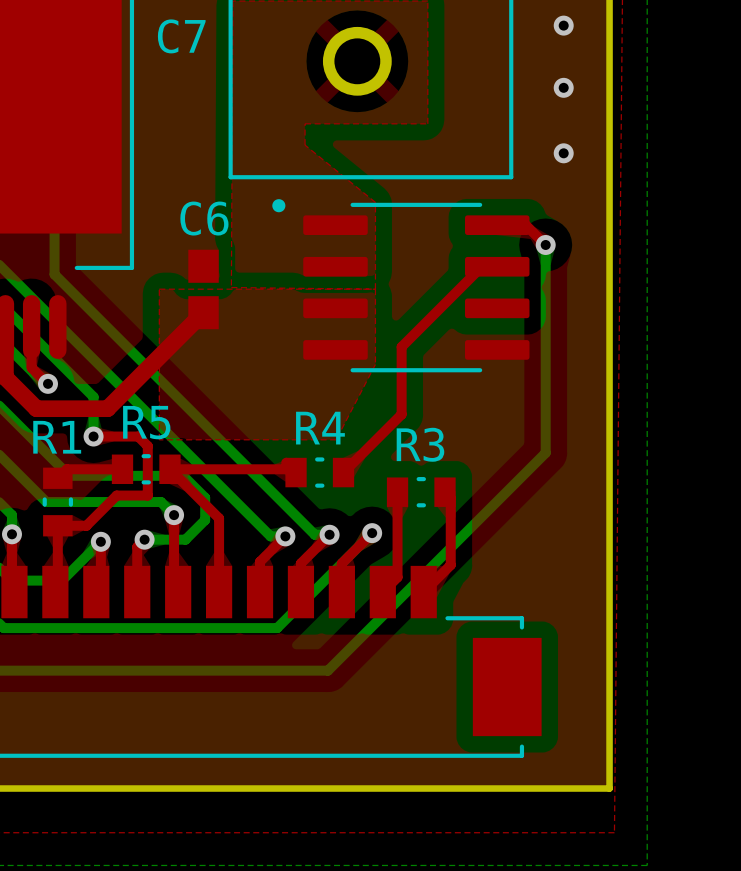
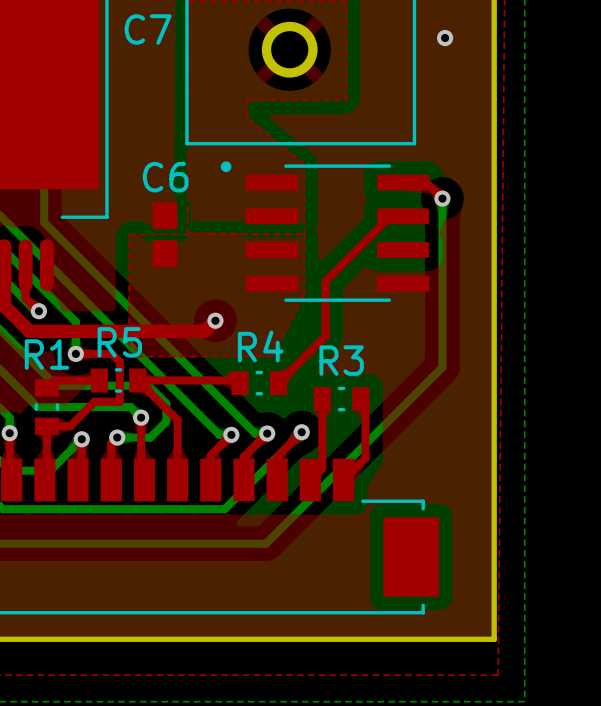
via: (563, 25) -> none
via: none -> (445, 38)
via: (563, 87) -> none
via: (563, 153) -> none
top track: (203, 312) (107, 408) -> (215, 320) (204, 331) (87, 331)
via: none -> (215, 320)

